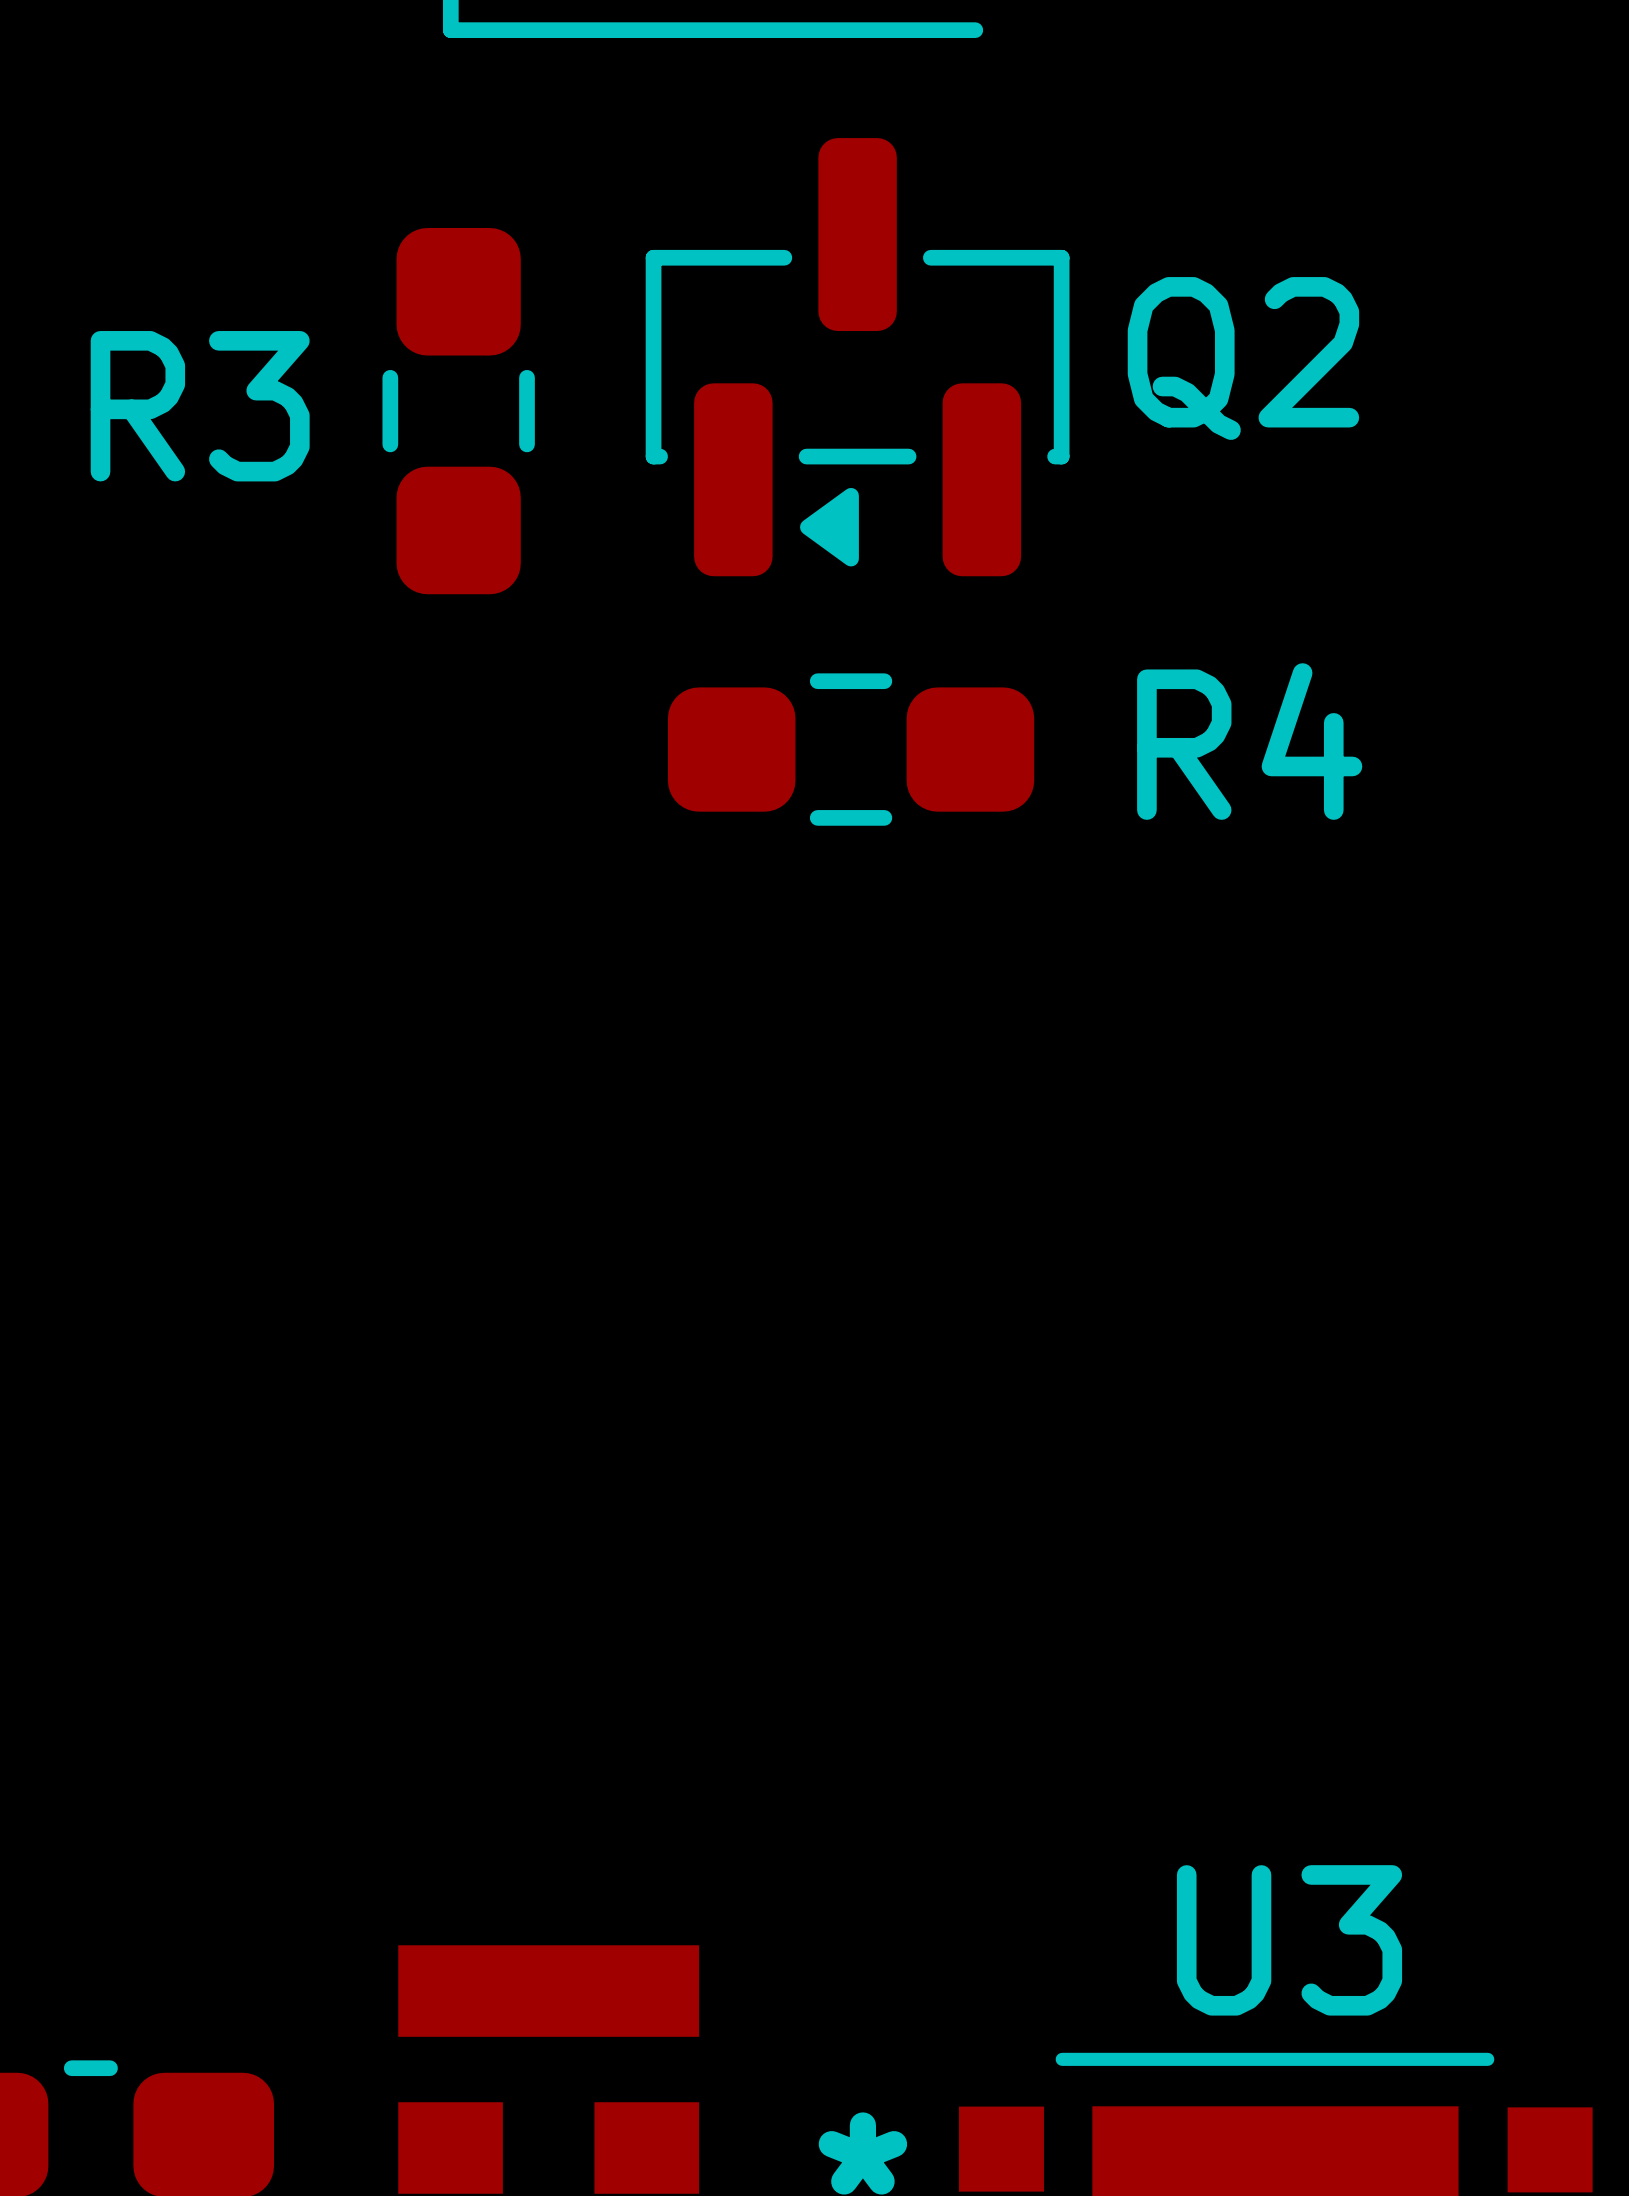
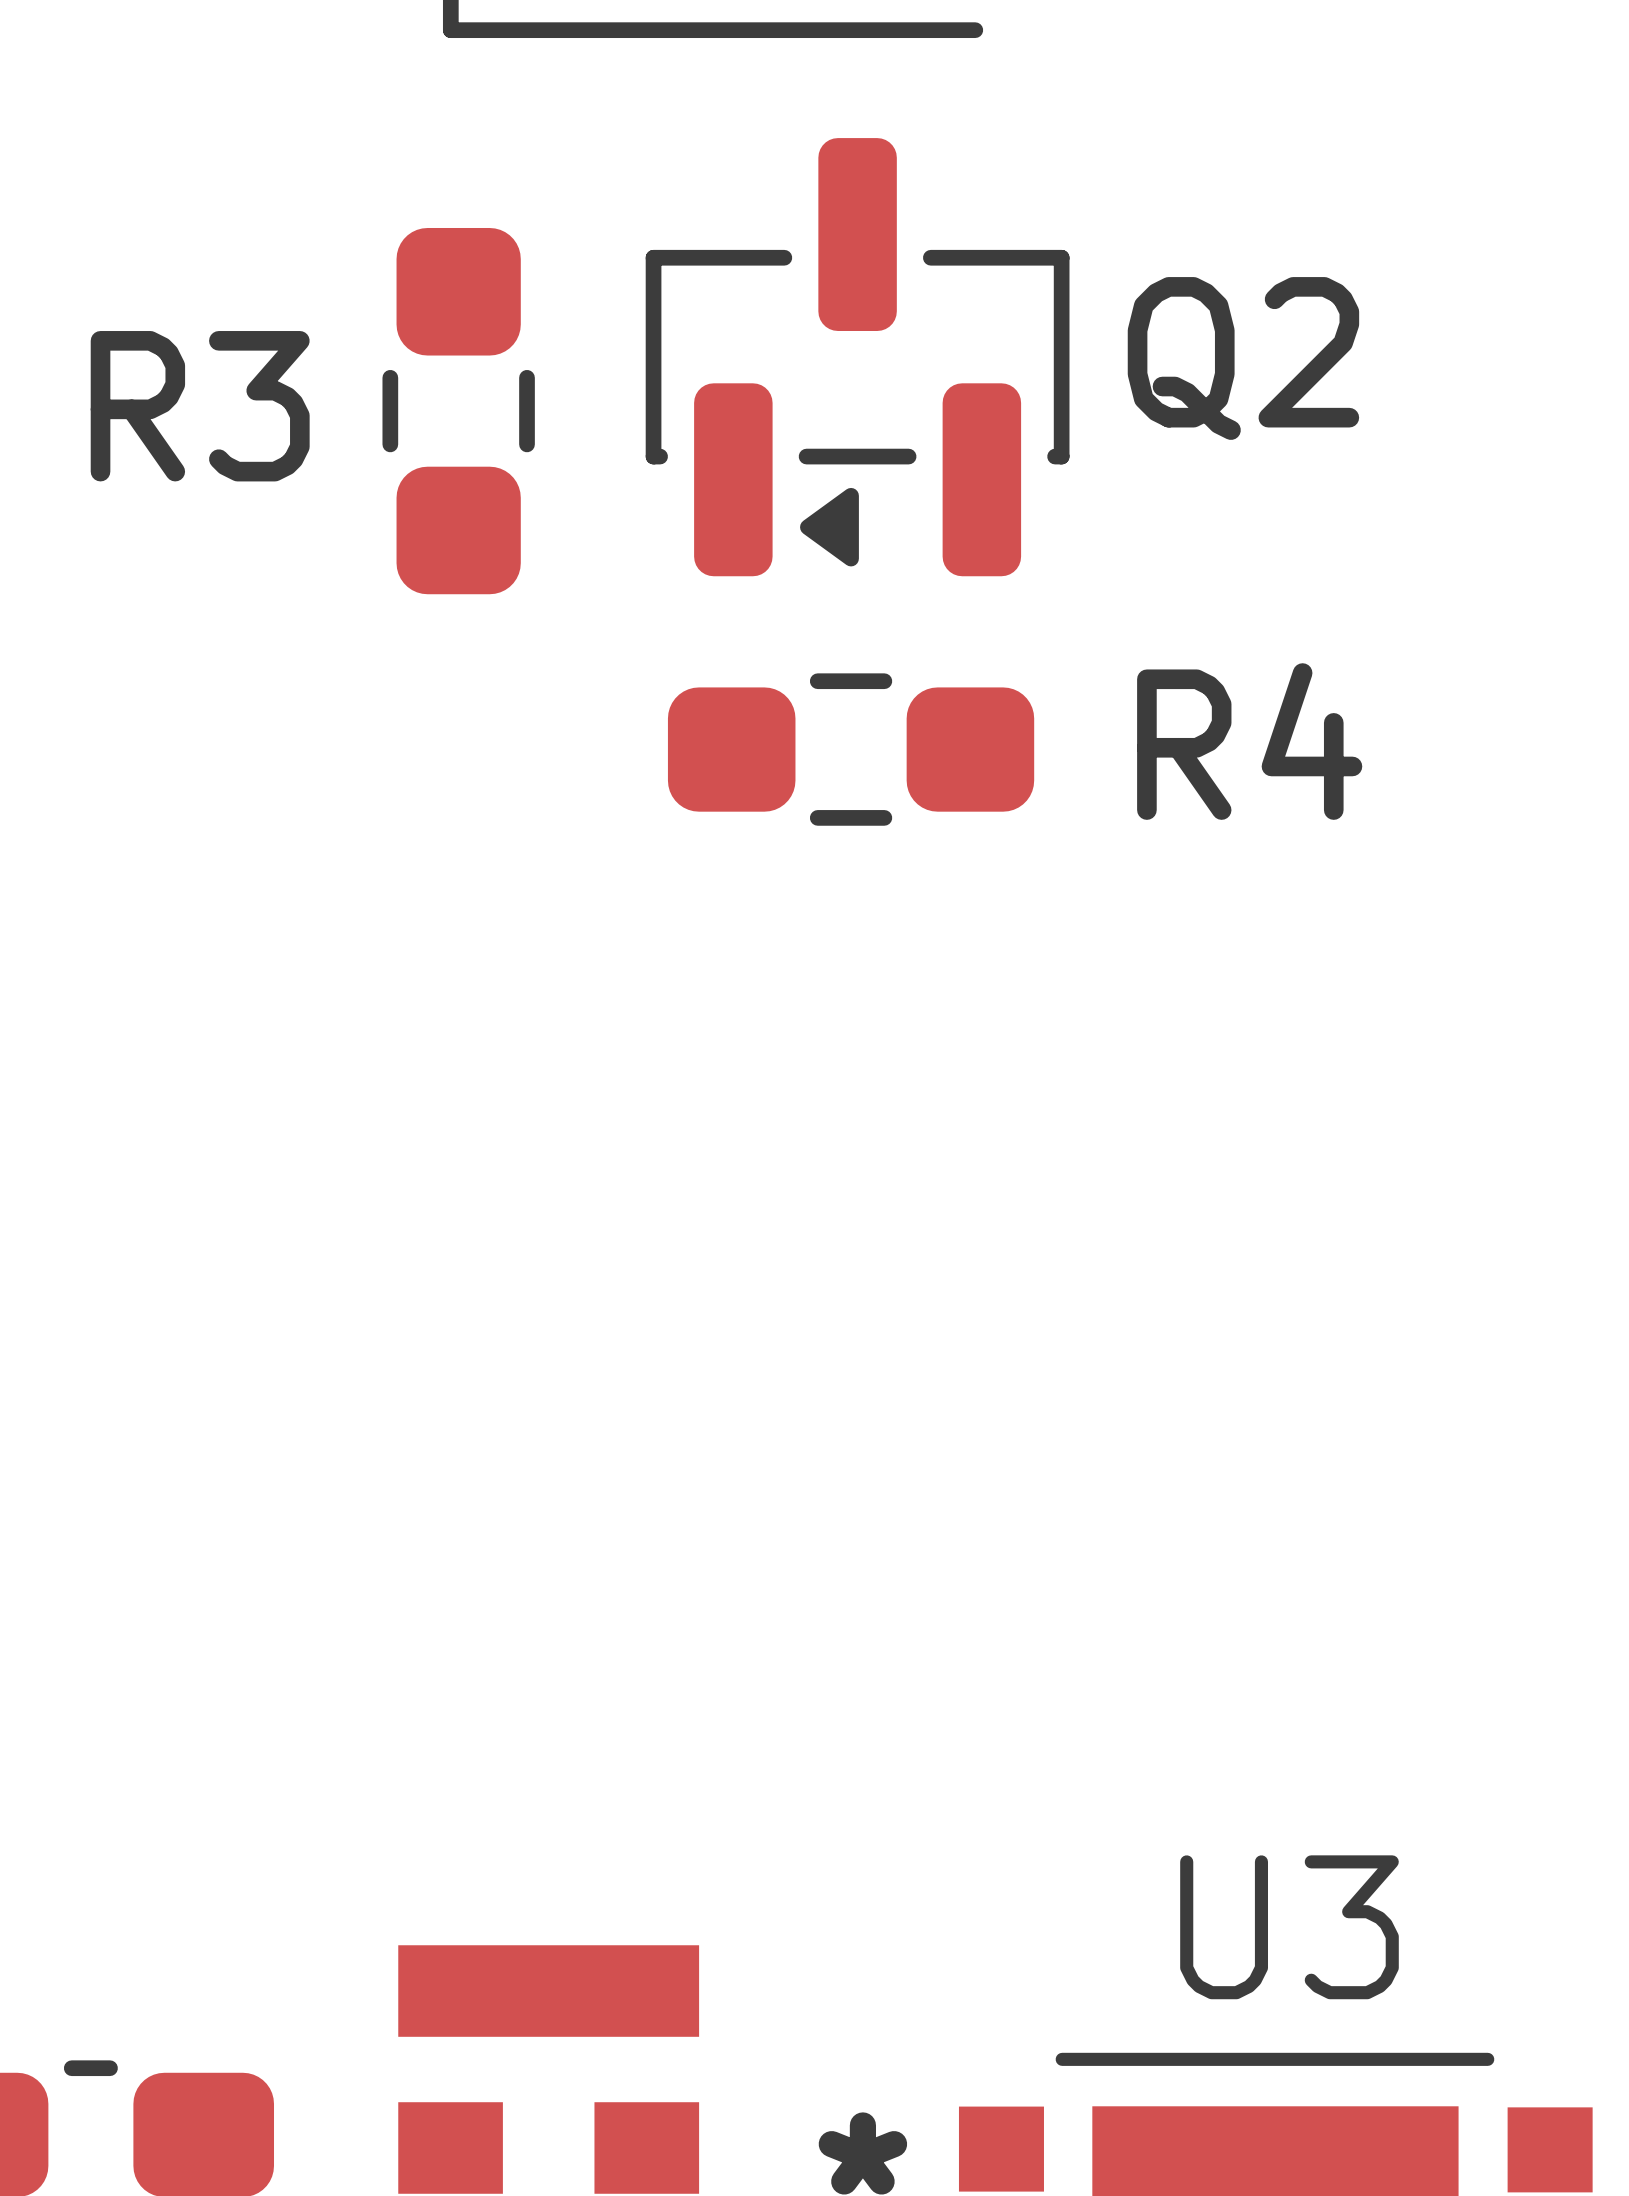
U3 name position: U3 (1289, 1940) -> U3 (1289, 1927)

